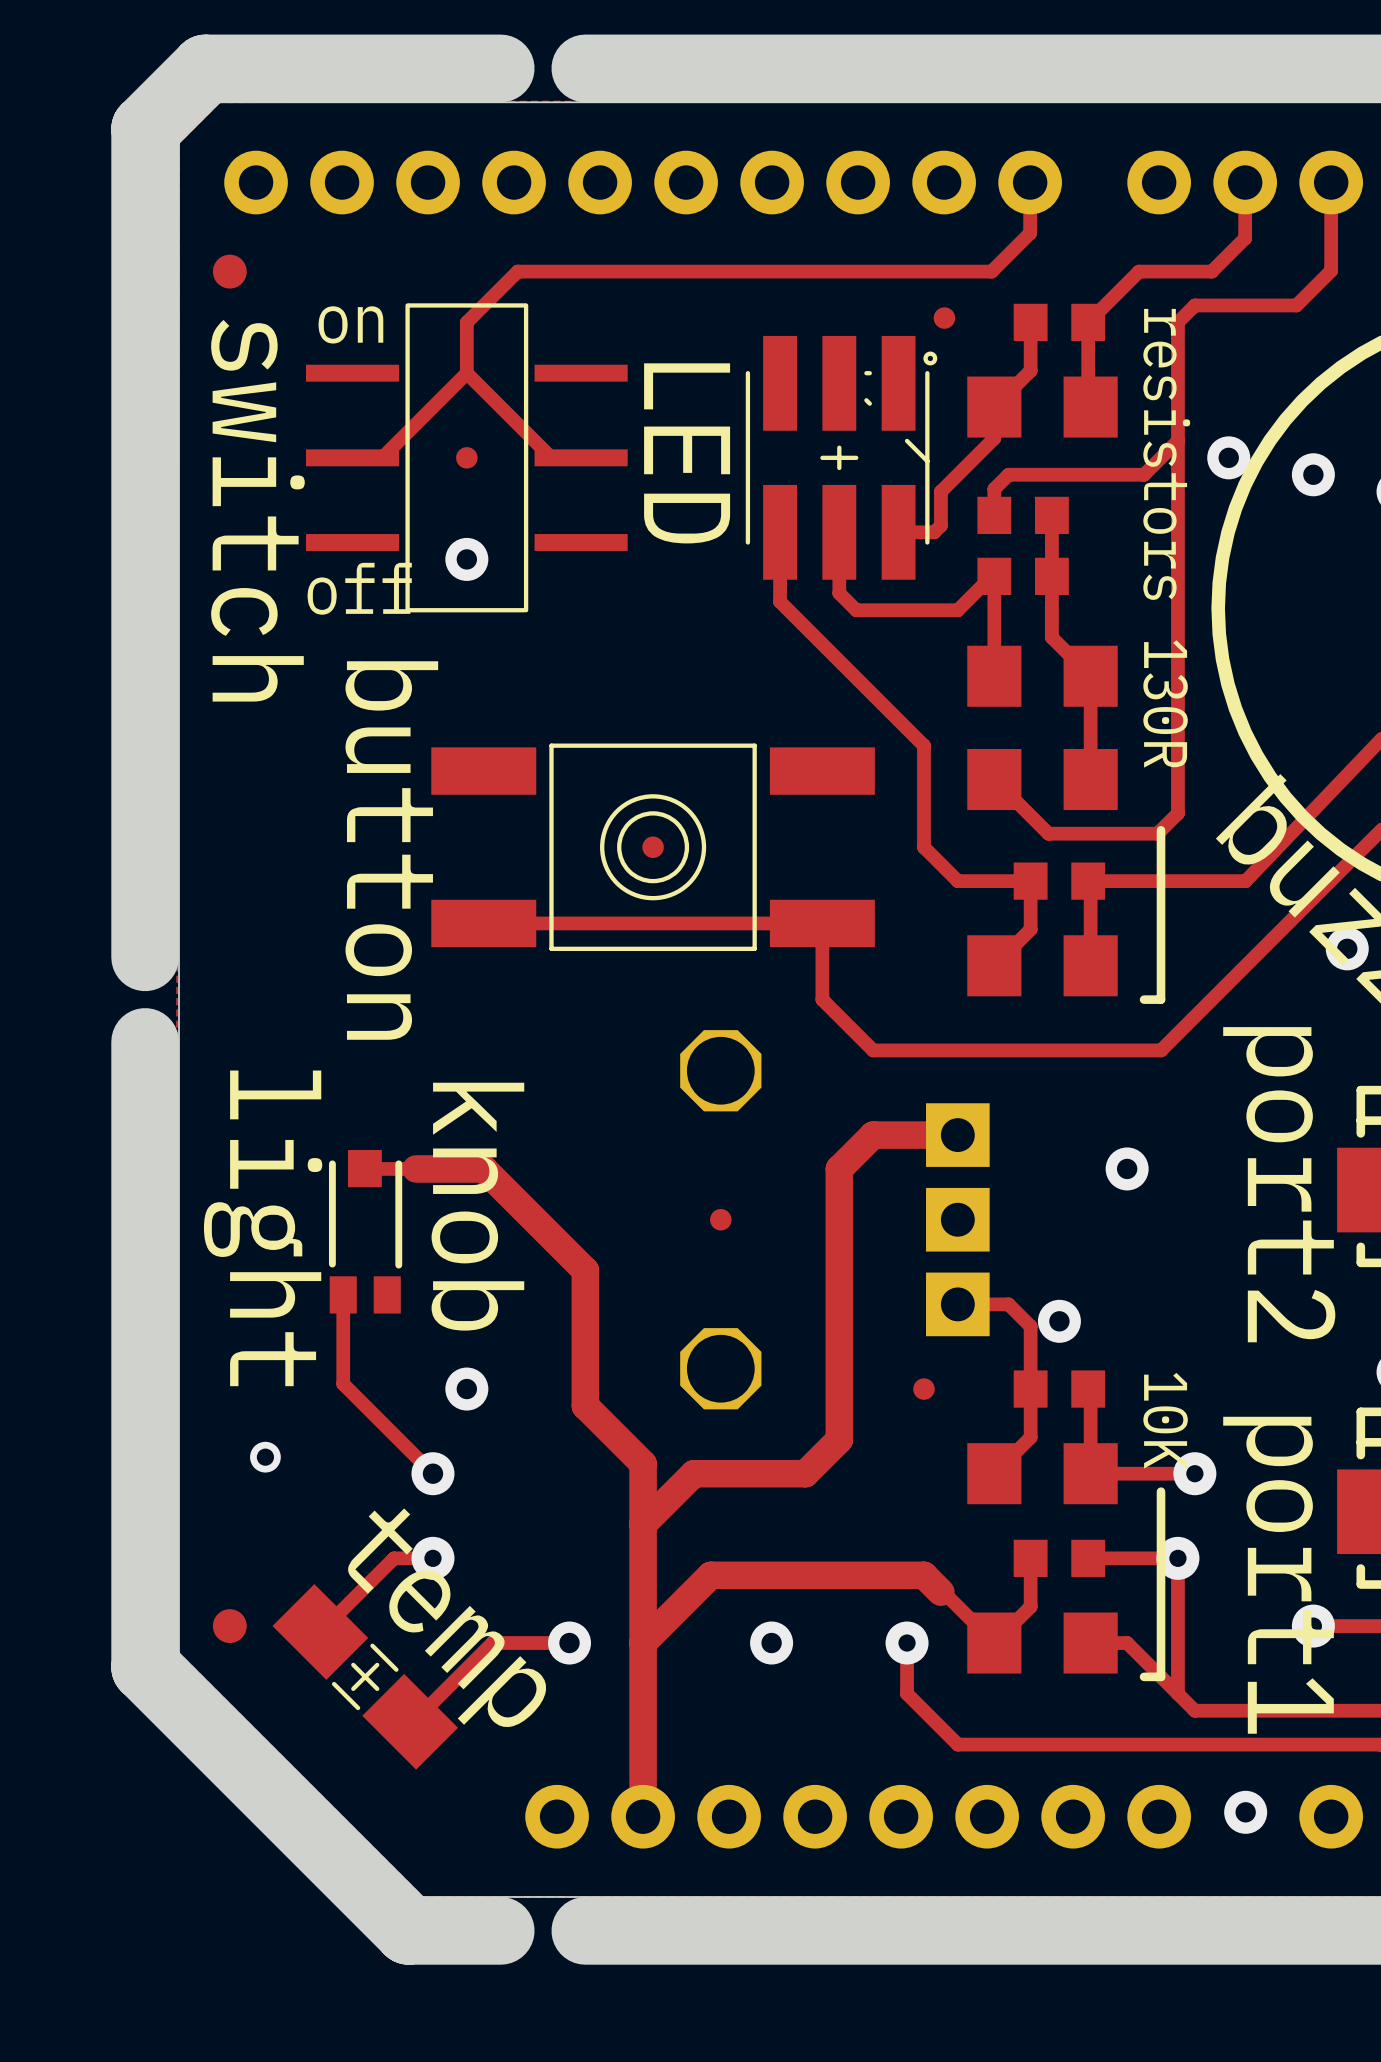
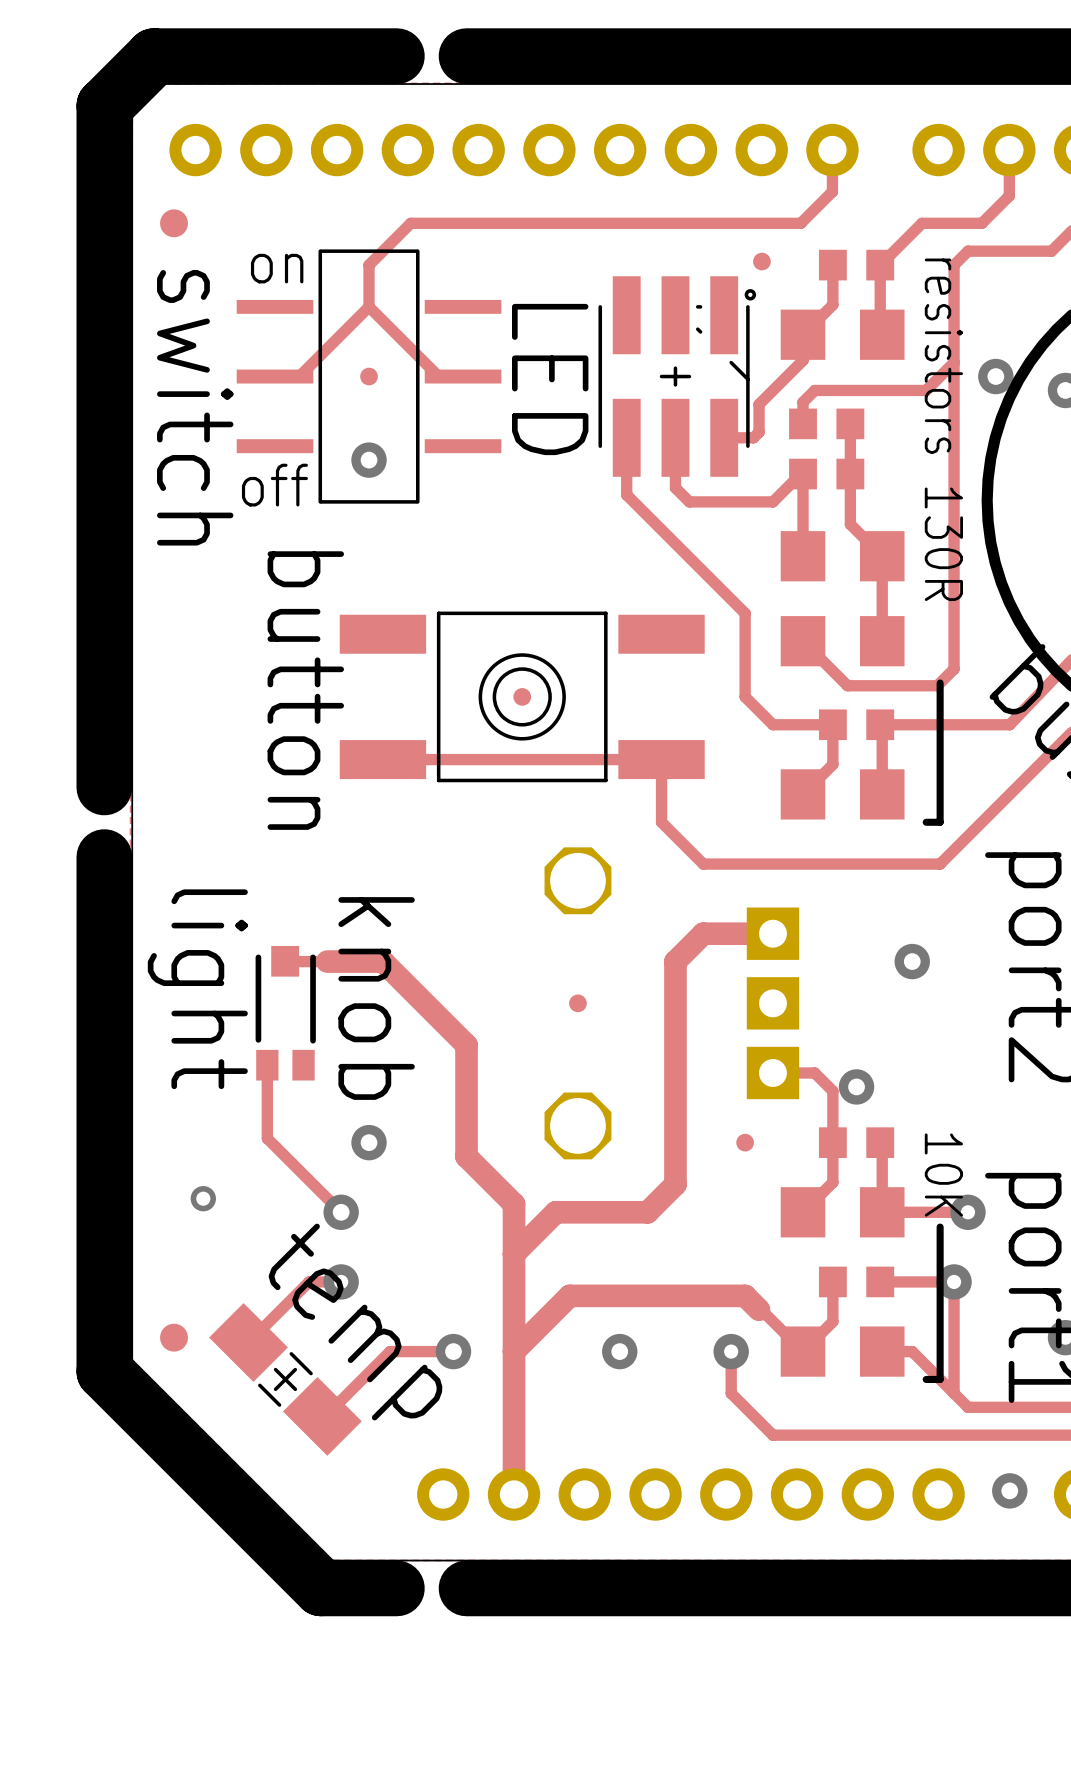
text position: temp (447, 1618) -> temp (355, 1322)

